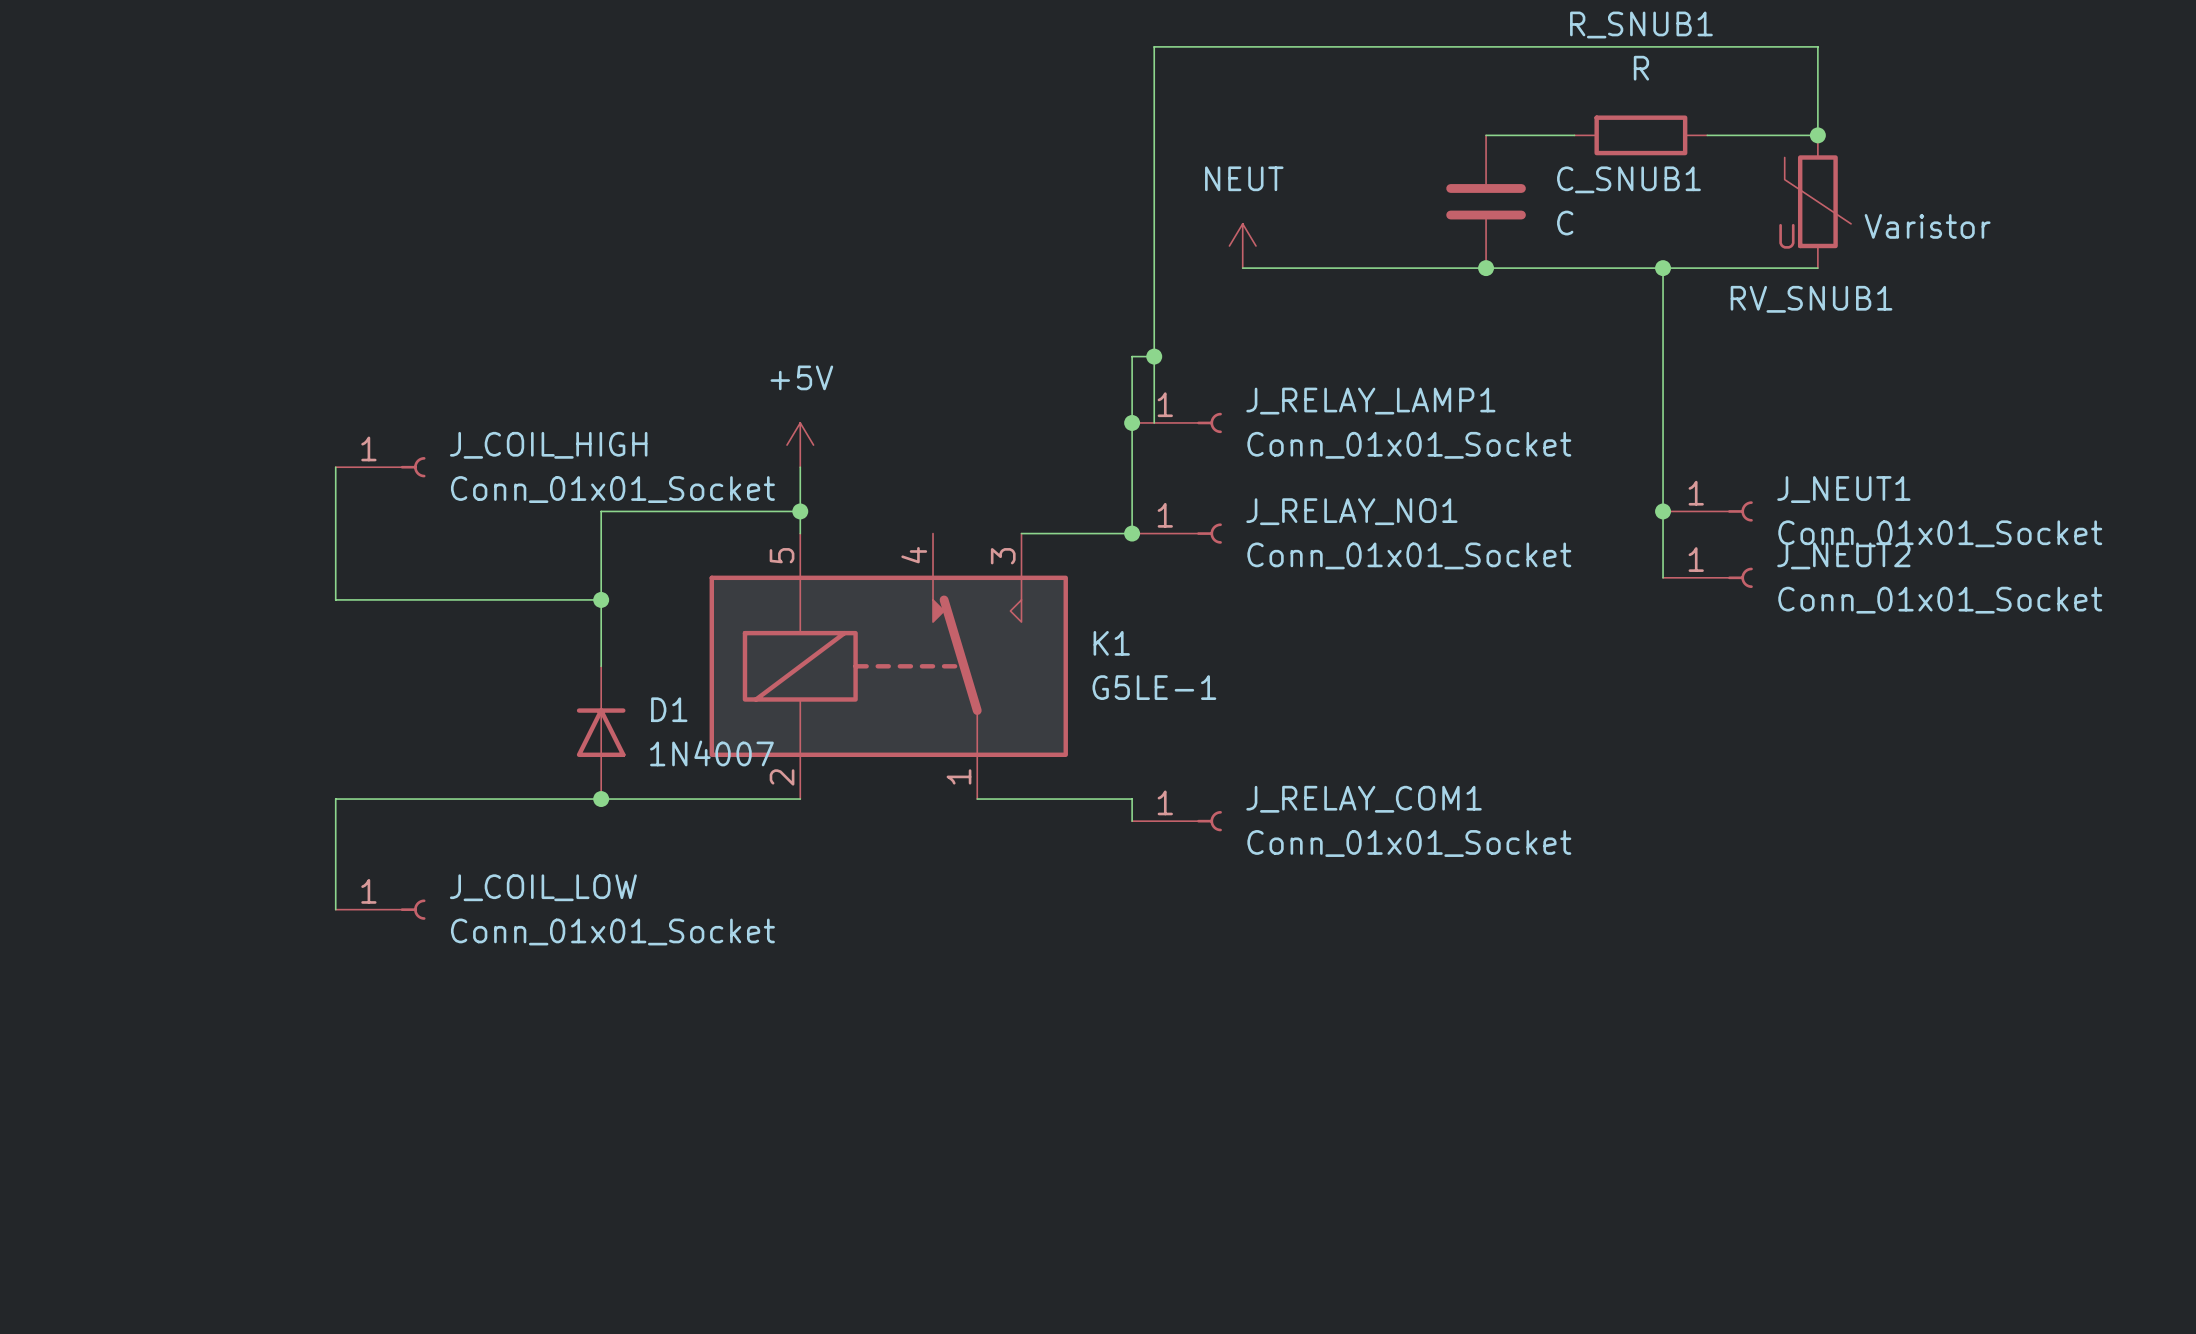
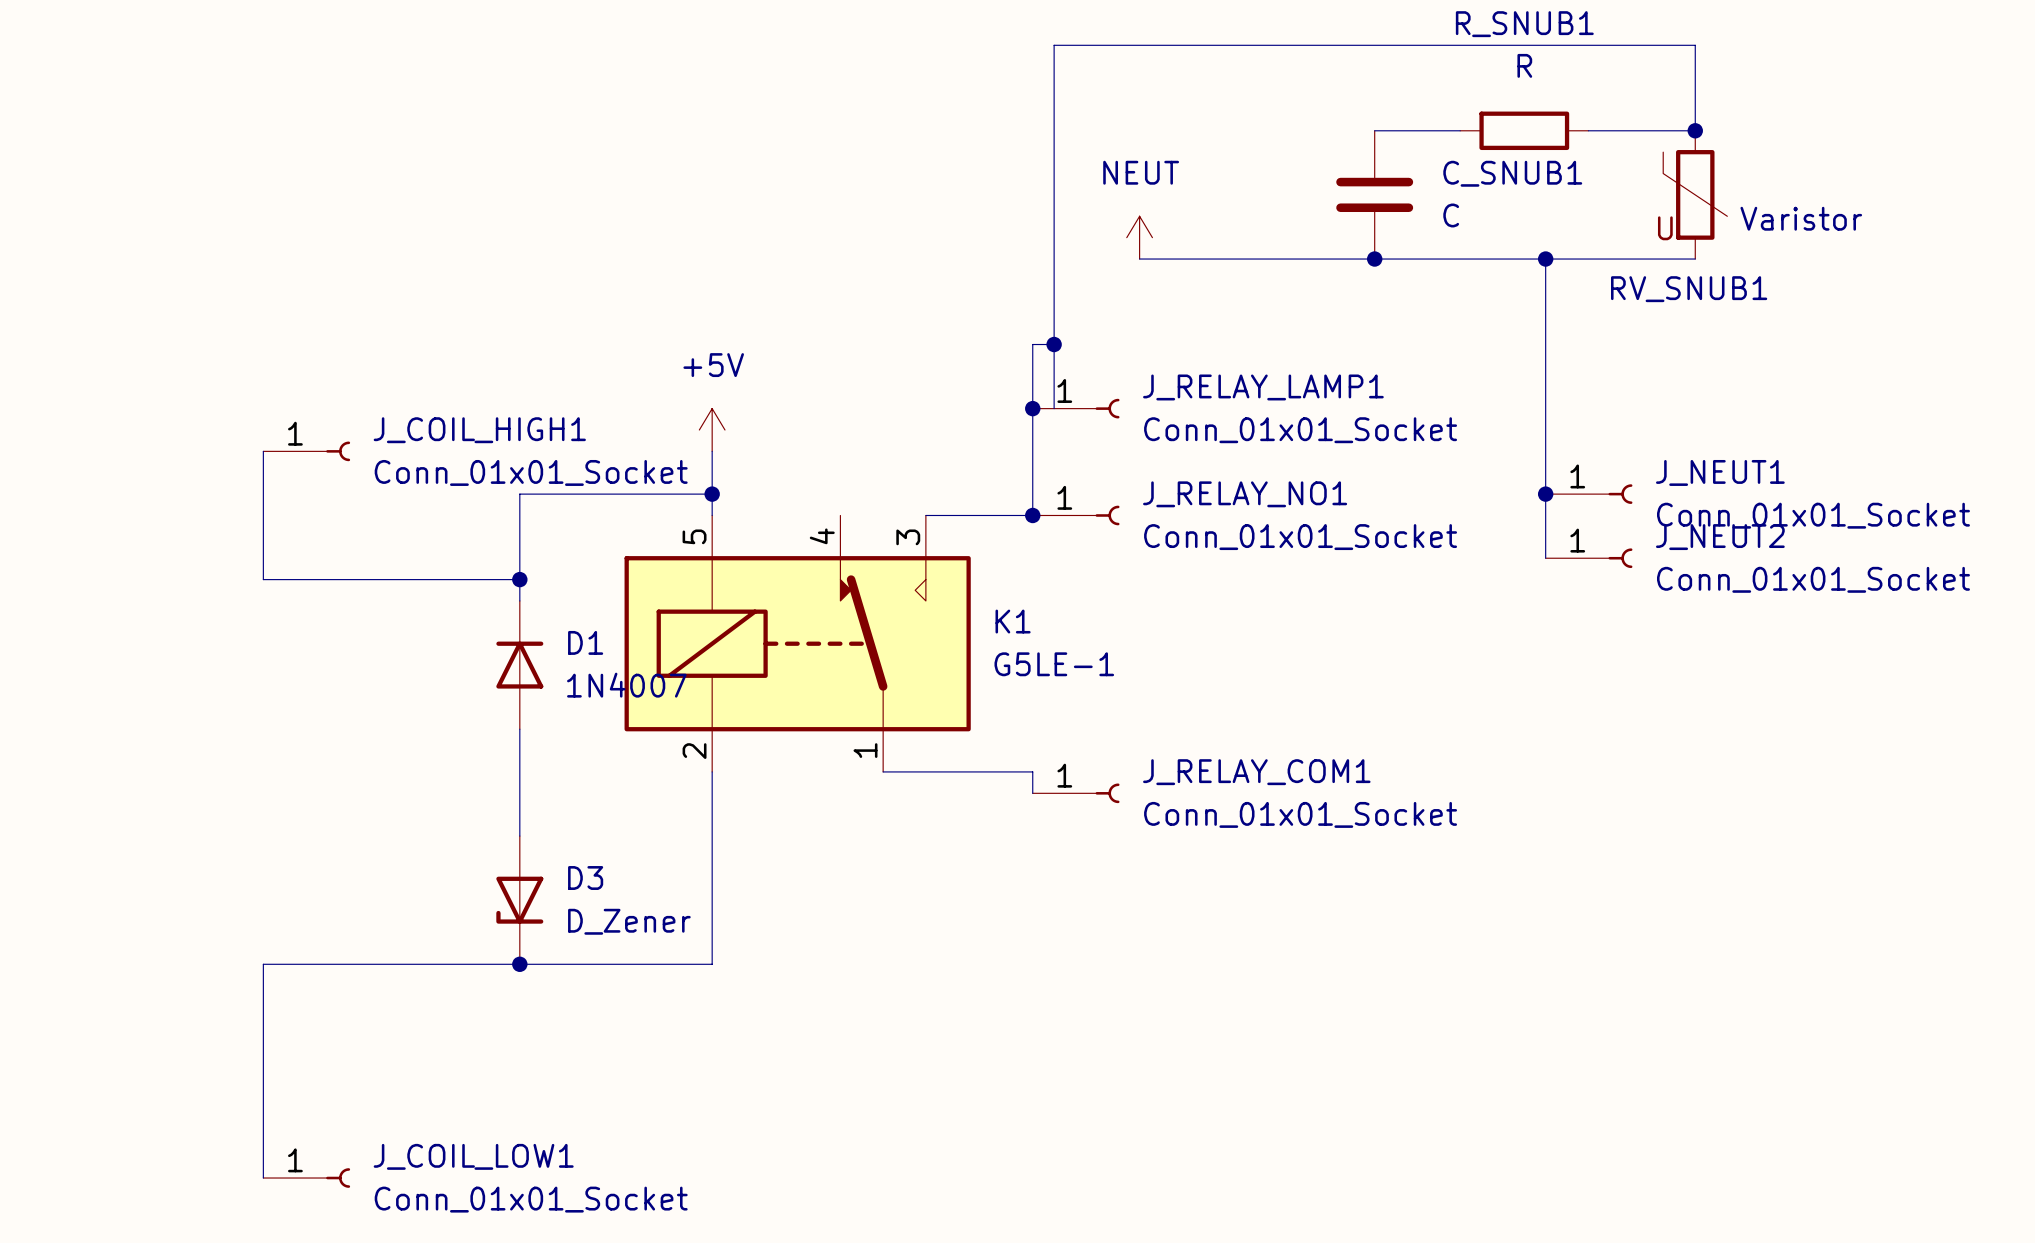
J_COIL_HIGH name: J_COIL_HIGH (548, 445) -> J_COIL_HIGH1 (479, 430)
D1 position: (601, 732) -> (519, 665)
wire: none -> (519, 729) (519, 836)
junction: (601, 799) -> none
wire: (800, 799) (335, 799) (335, 909) -> (712, 771) (712, 964) (263, 964) (263, 1178)
J_COIL_LOW: Conn_01x01_Socket (380, 909) -> none
D3: none -> D_Zener (519, 900)
junction: none -> (519, 964)
J_COIL_LOW1: none -> Conn_01x01_Socket (306, 1178)

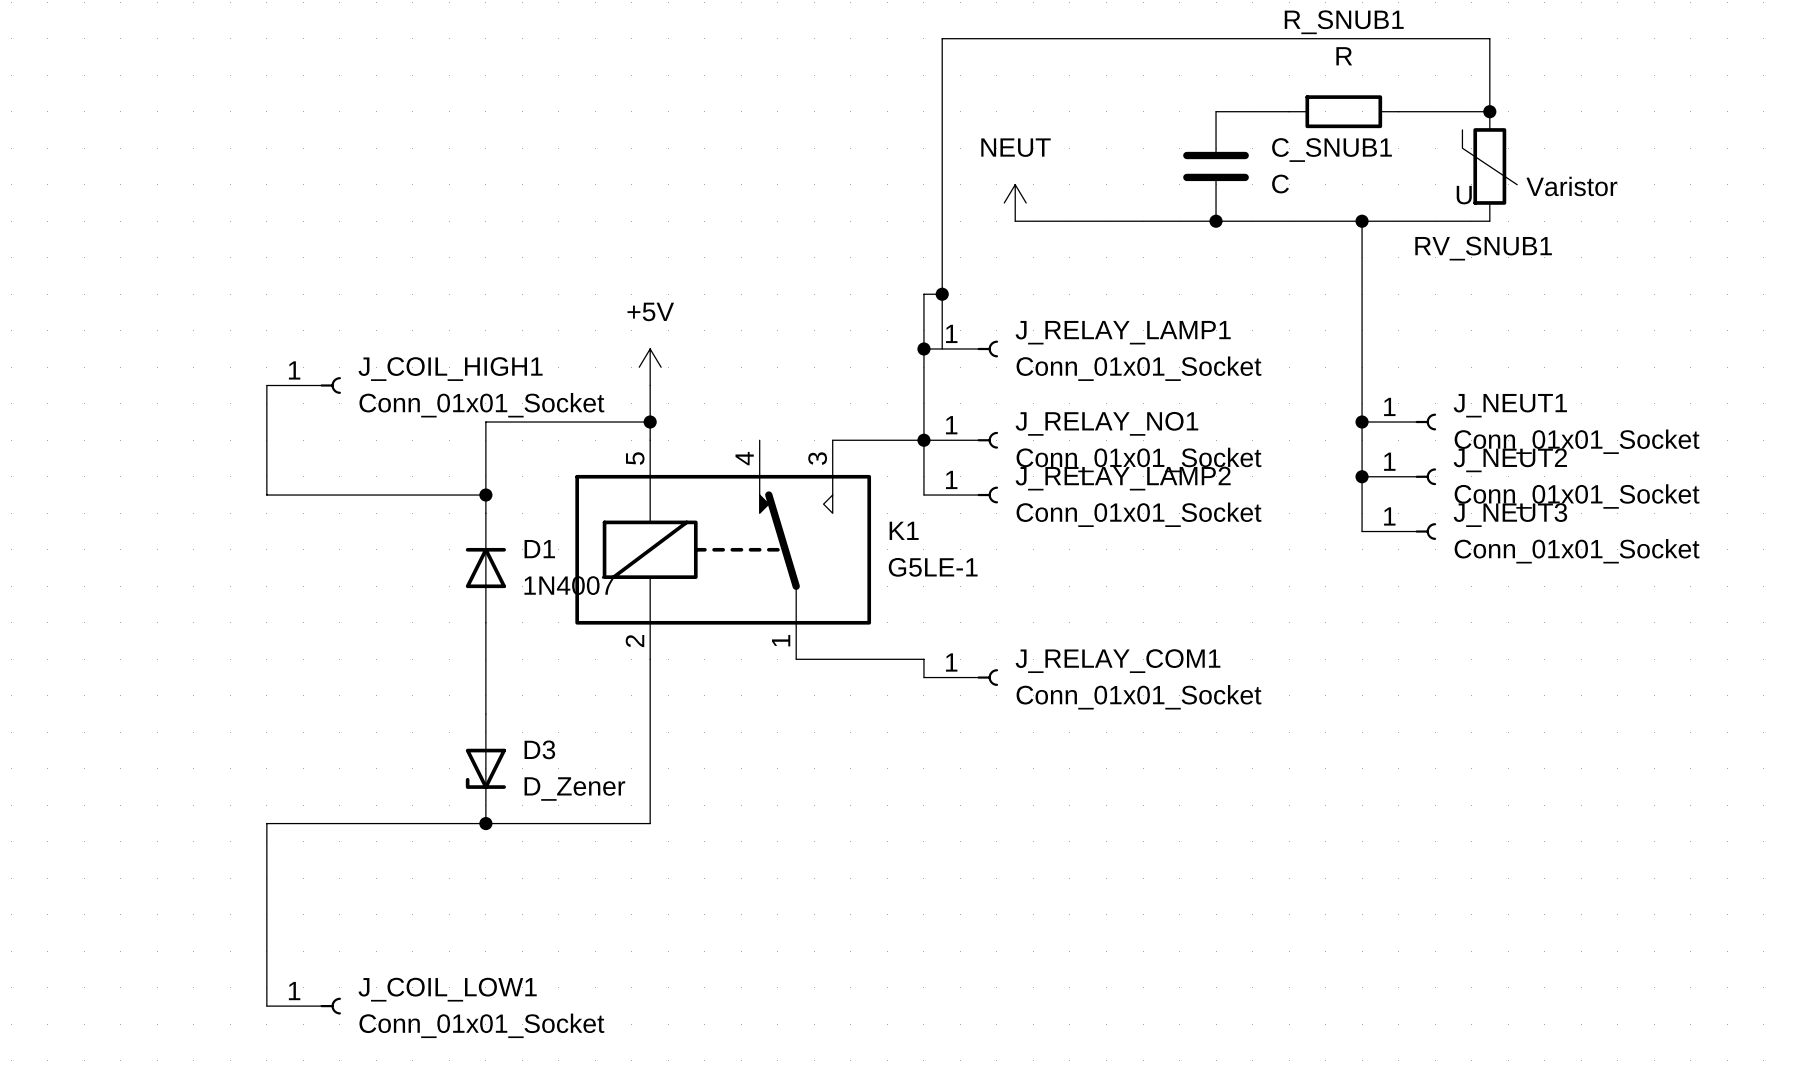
wire: none -> (923, 440) (923, 495)
wire: none -> (1362, 476) (1362, 531)
junction: none -> (1362, 476)
J_RELAY_LAMP2: none -> Conn_01x01_Socket (961, 495)
J_NEUT3: none -> Conn_01x01_Socket (1399, 531)

